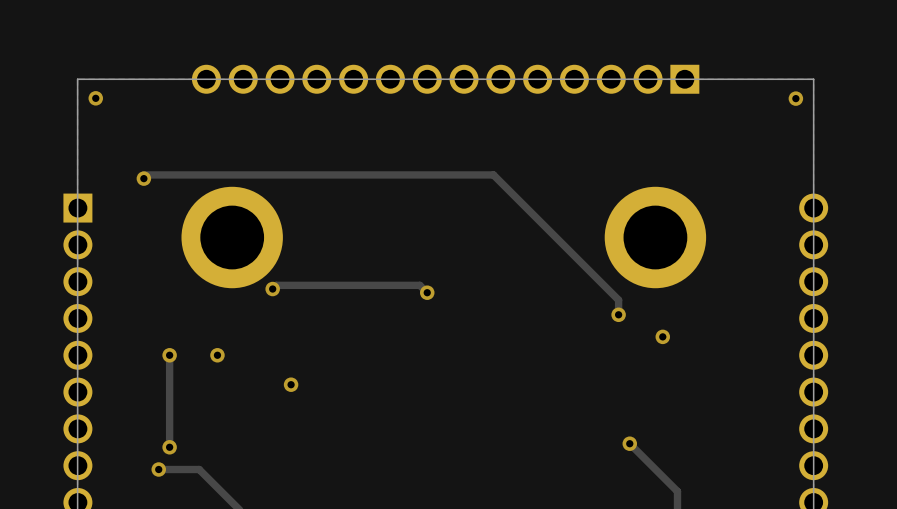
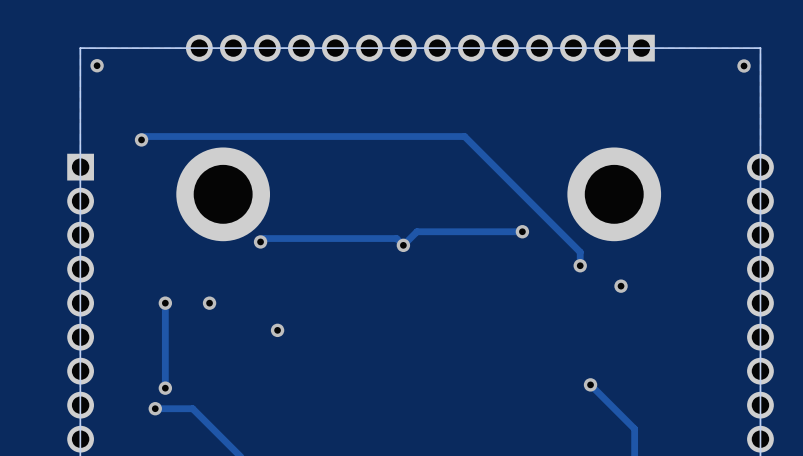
track: none -> (522, 231) (416, 231) (403, 245)
via: none -> (522, 231)

